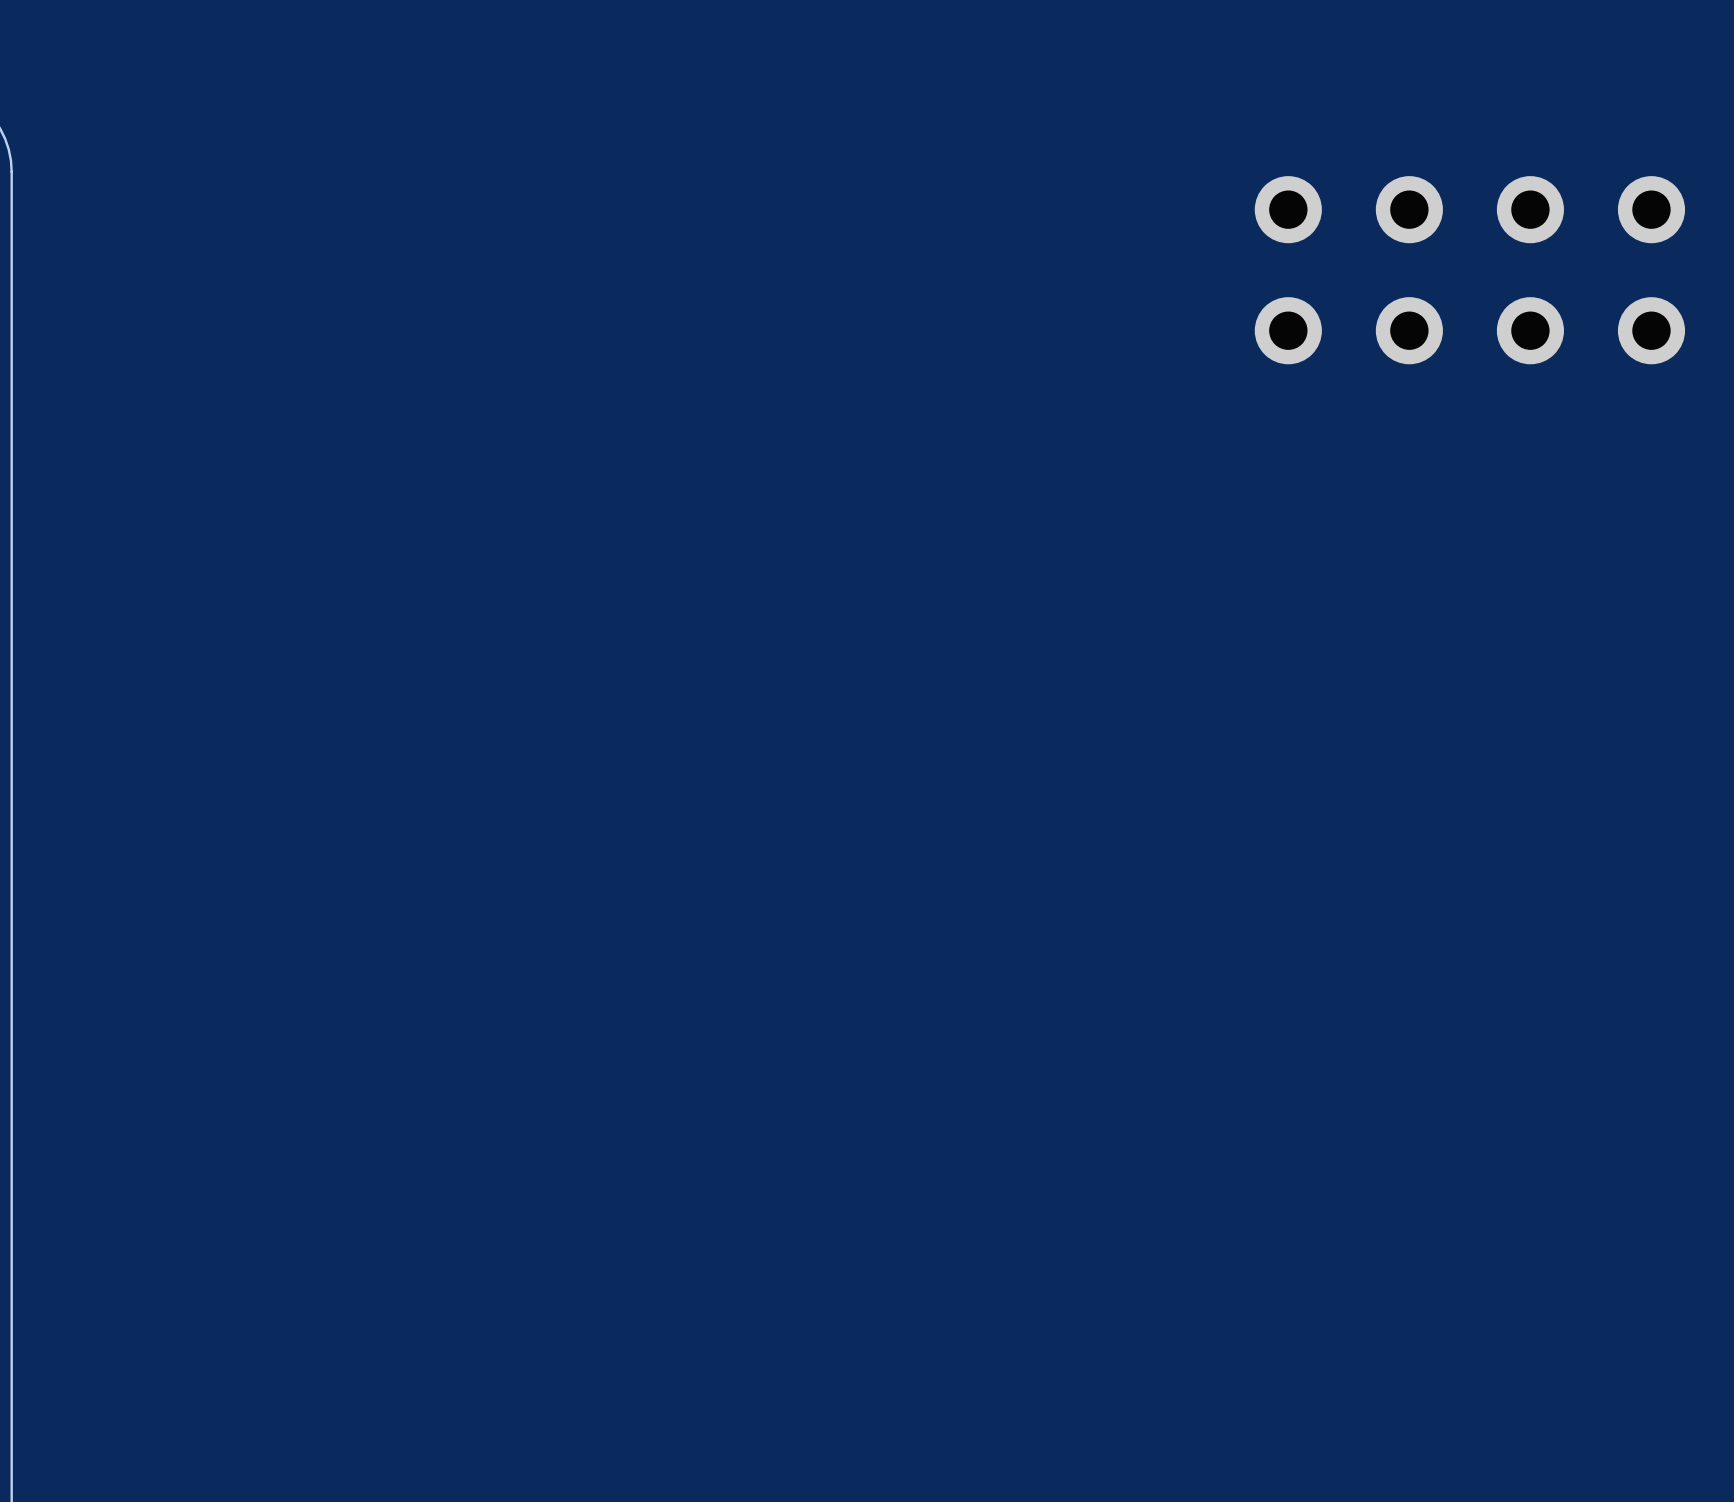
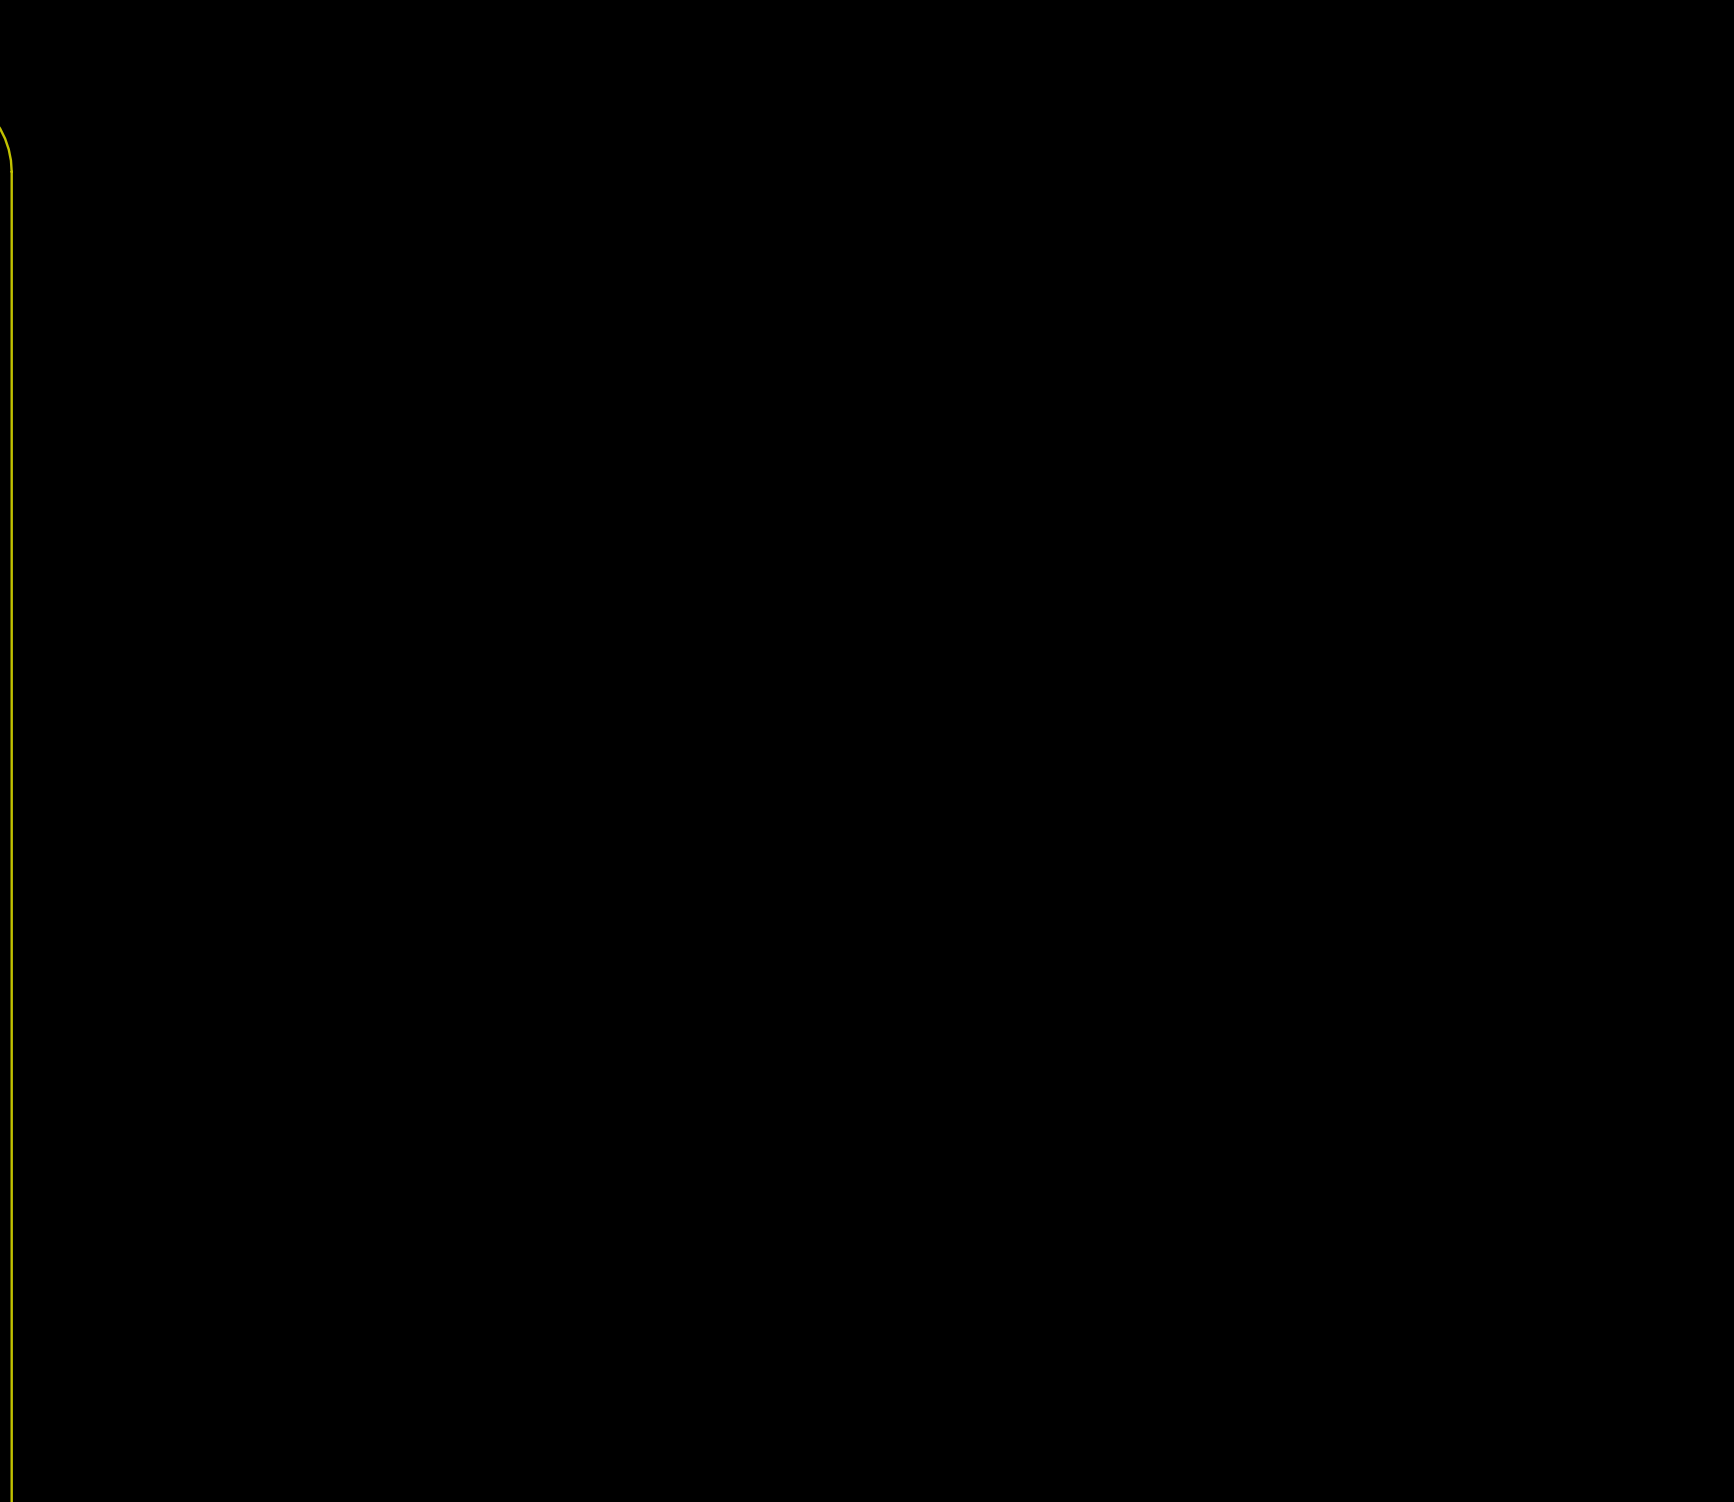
part: (1288, 209) -> none
part: (1409, 209) -> none
part: (1530, 209) -> none
part: (1651, 209) -> none
part: (1288, 330) -> none
part: (1409, 330) -> none
part: (1530, 330) -> none
part: (1651, 330) -> none

